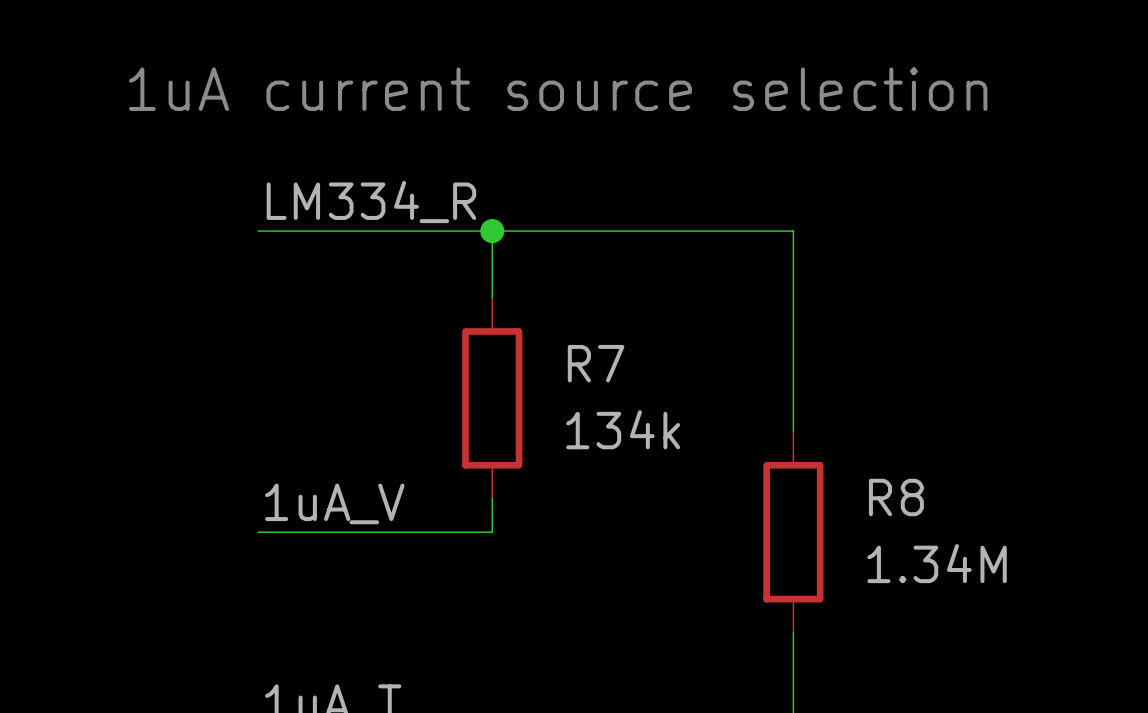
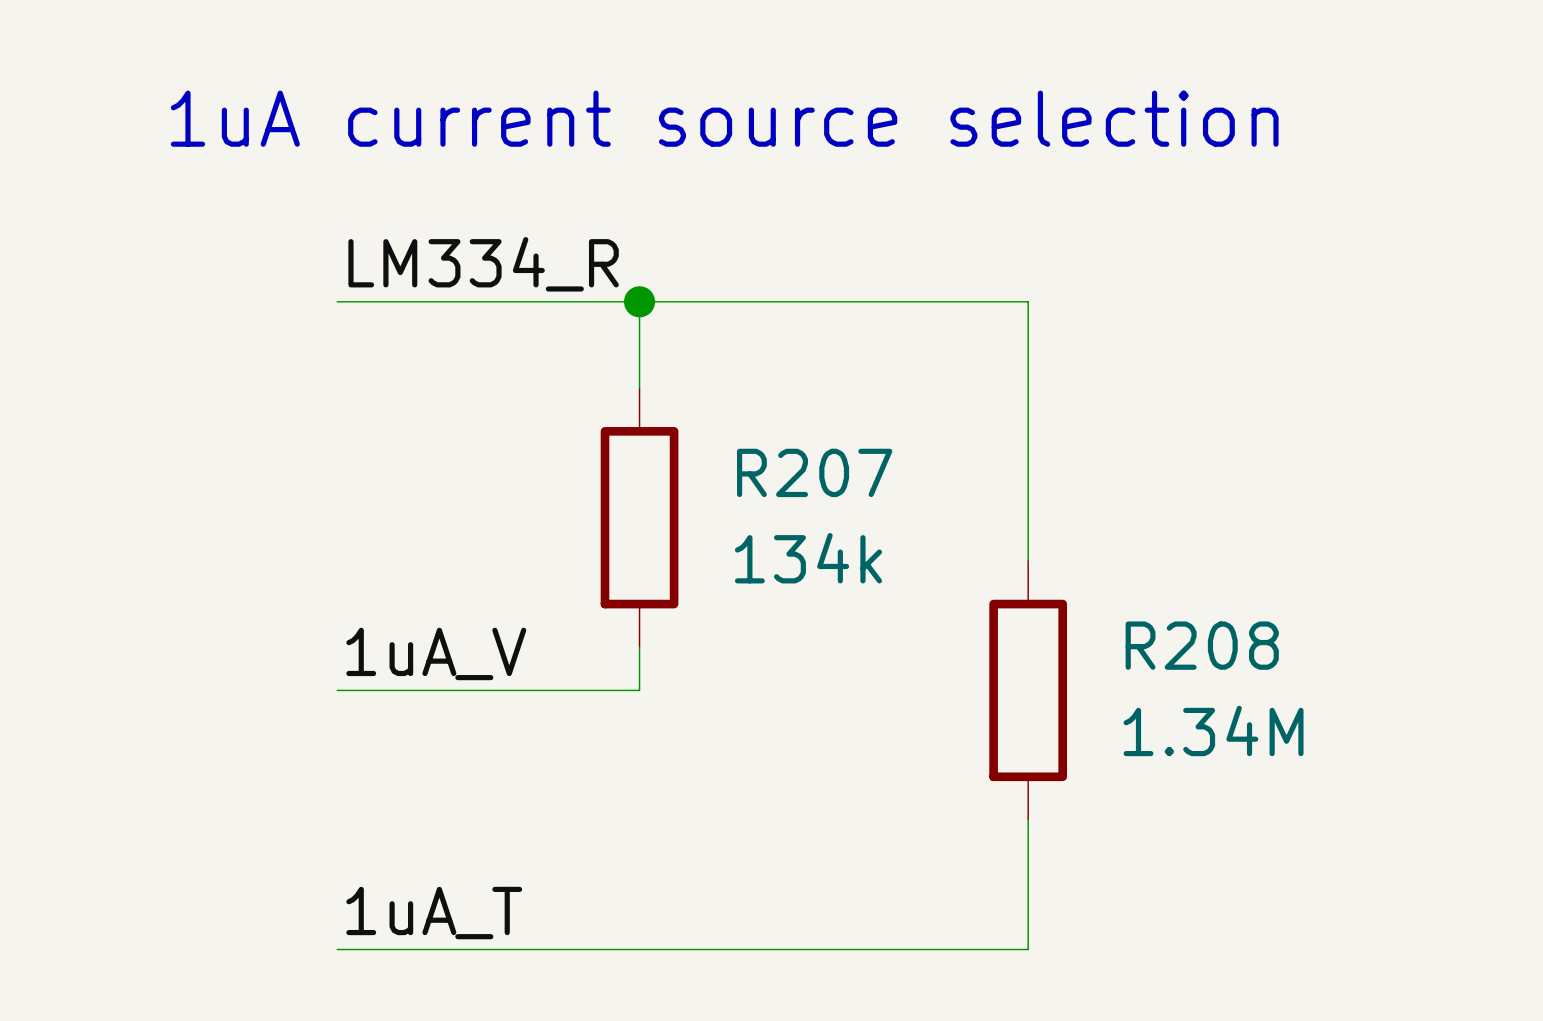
R7 name: R7 (596, 363) -> R207 (814, 472)
R8 name: R8 (896, 497) -> R208 (1202, 645)

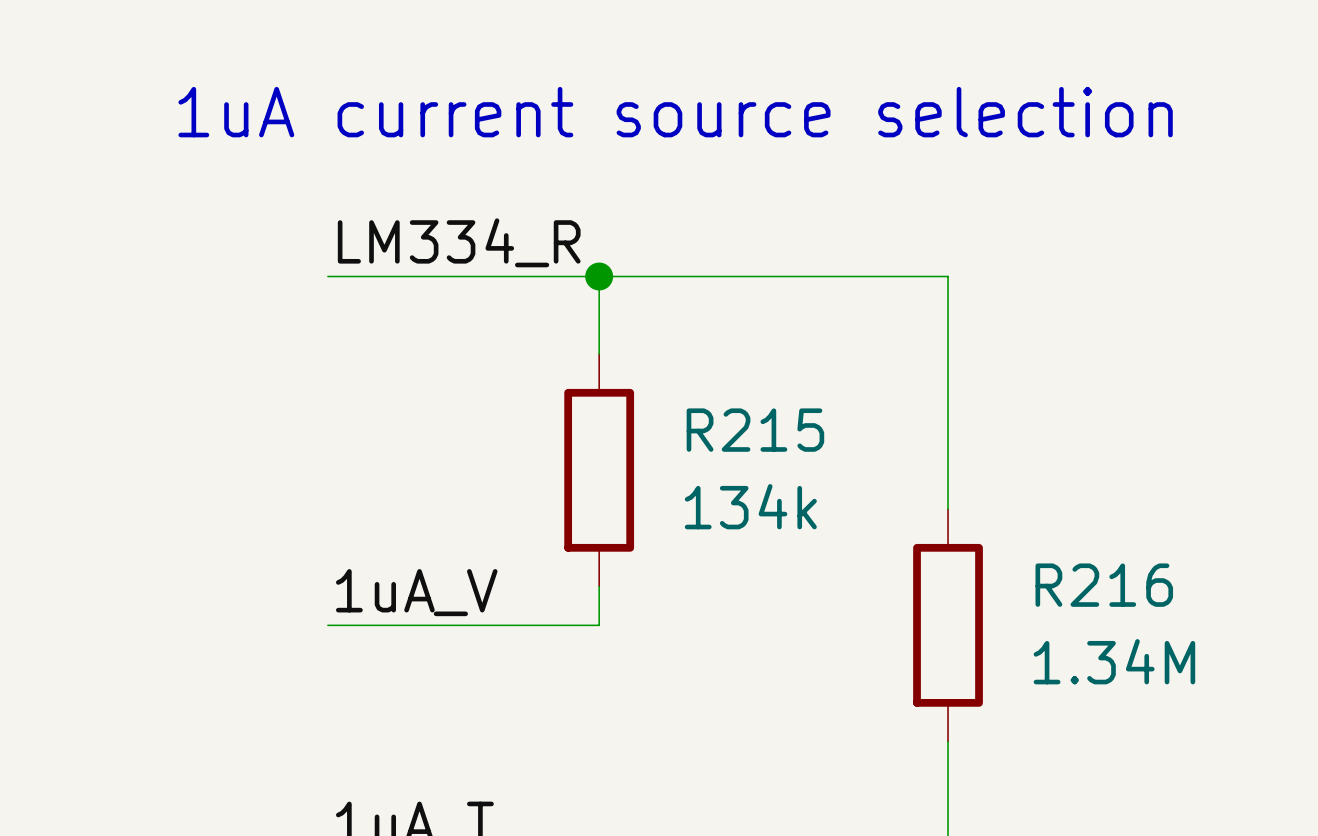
R207 name: R207 (814, 472) -> R215 (755, 430)
R208 name: R208 (1202, 645) -> R216 (1104, 585)

